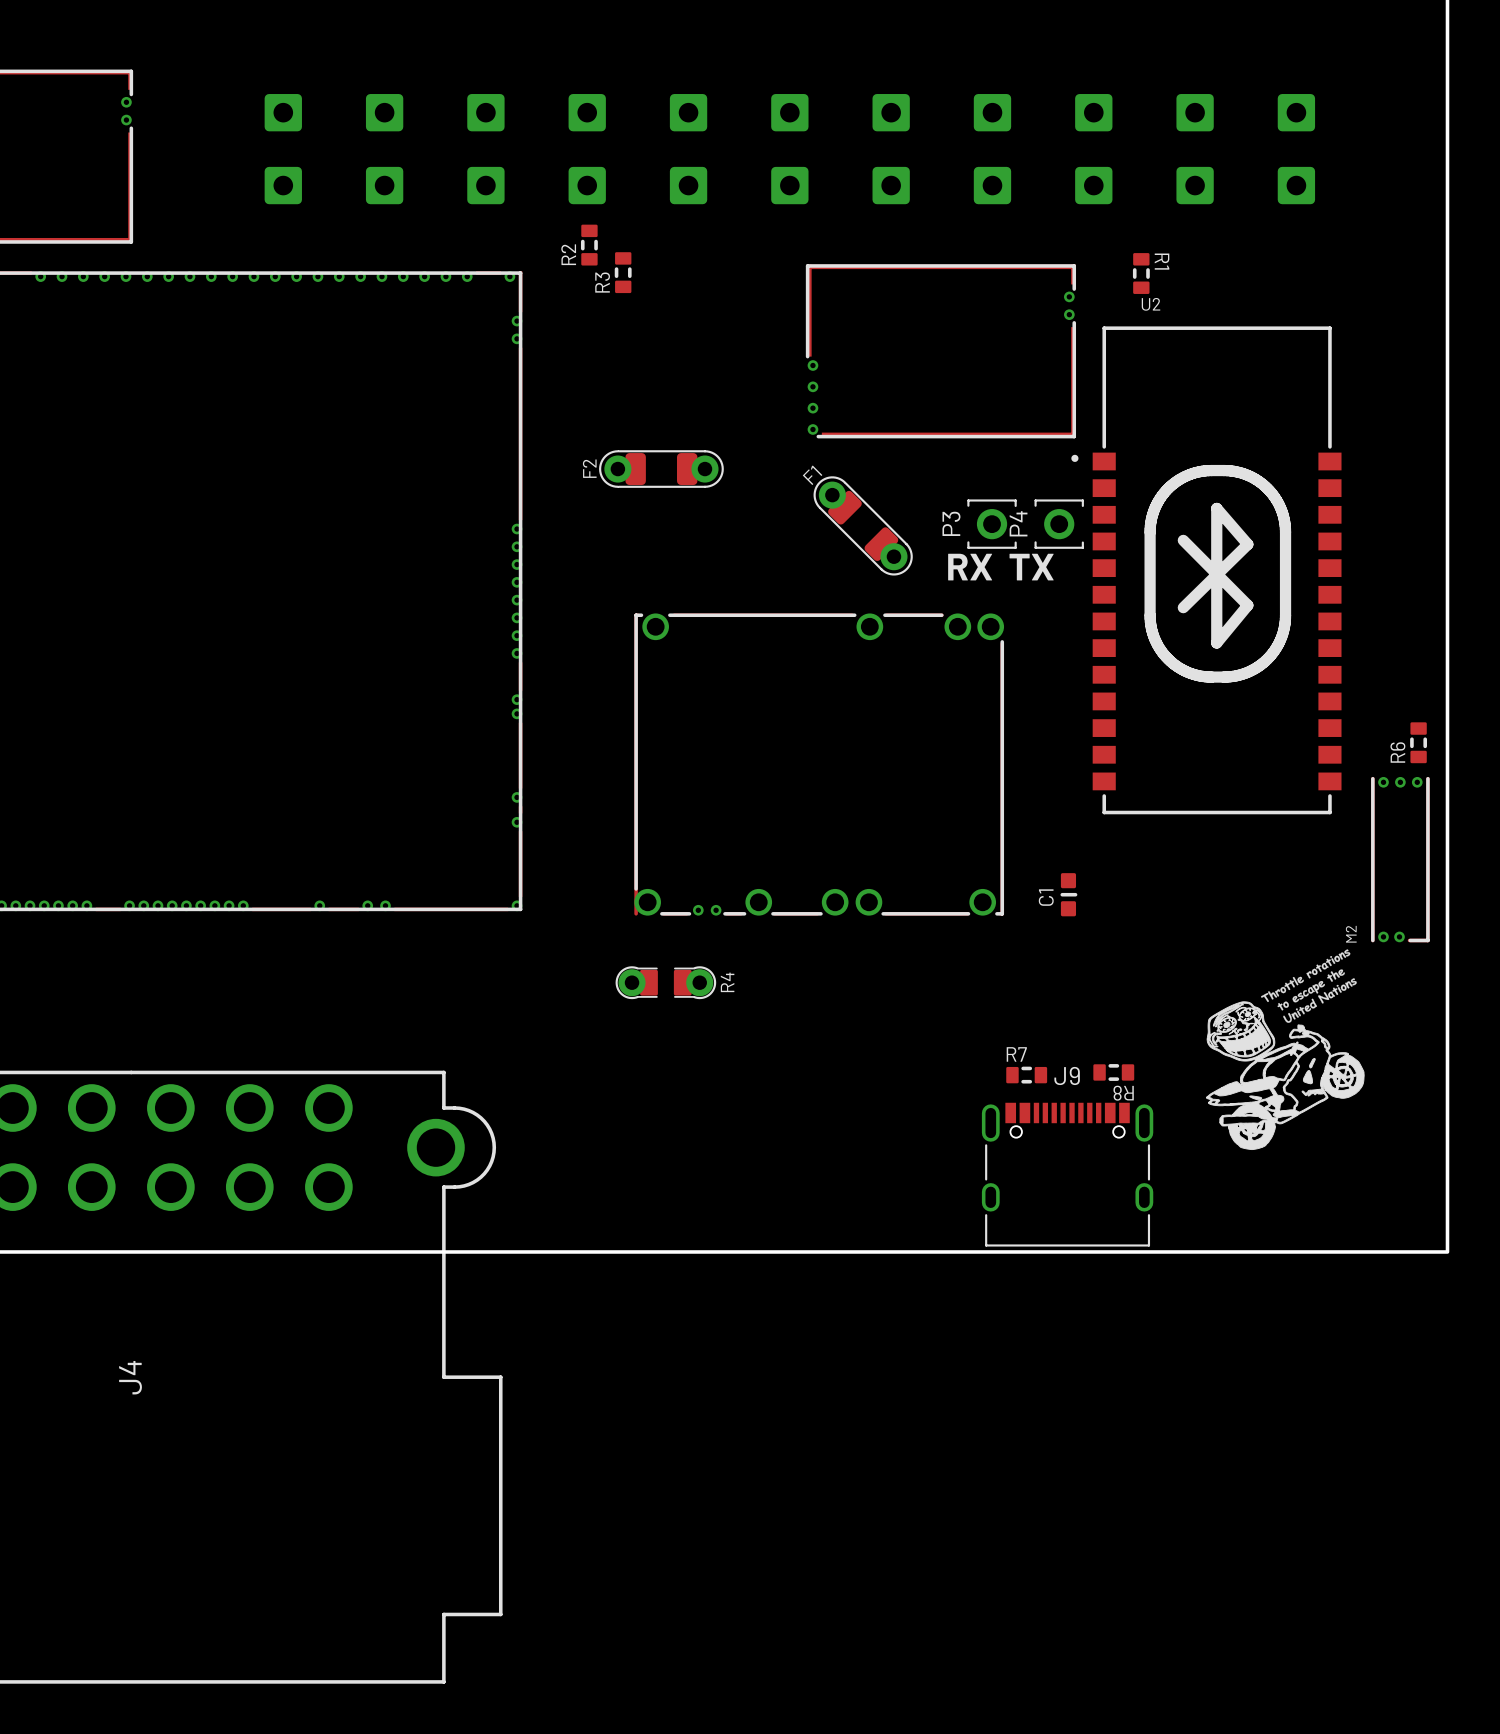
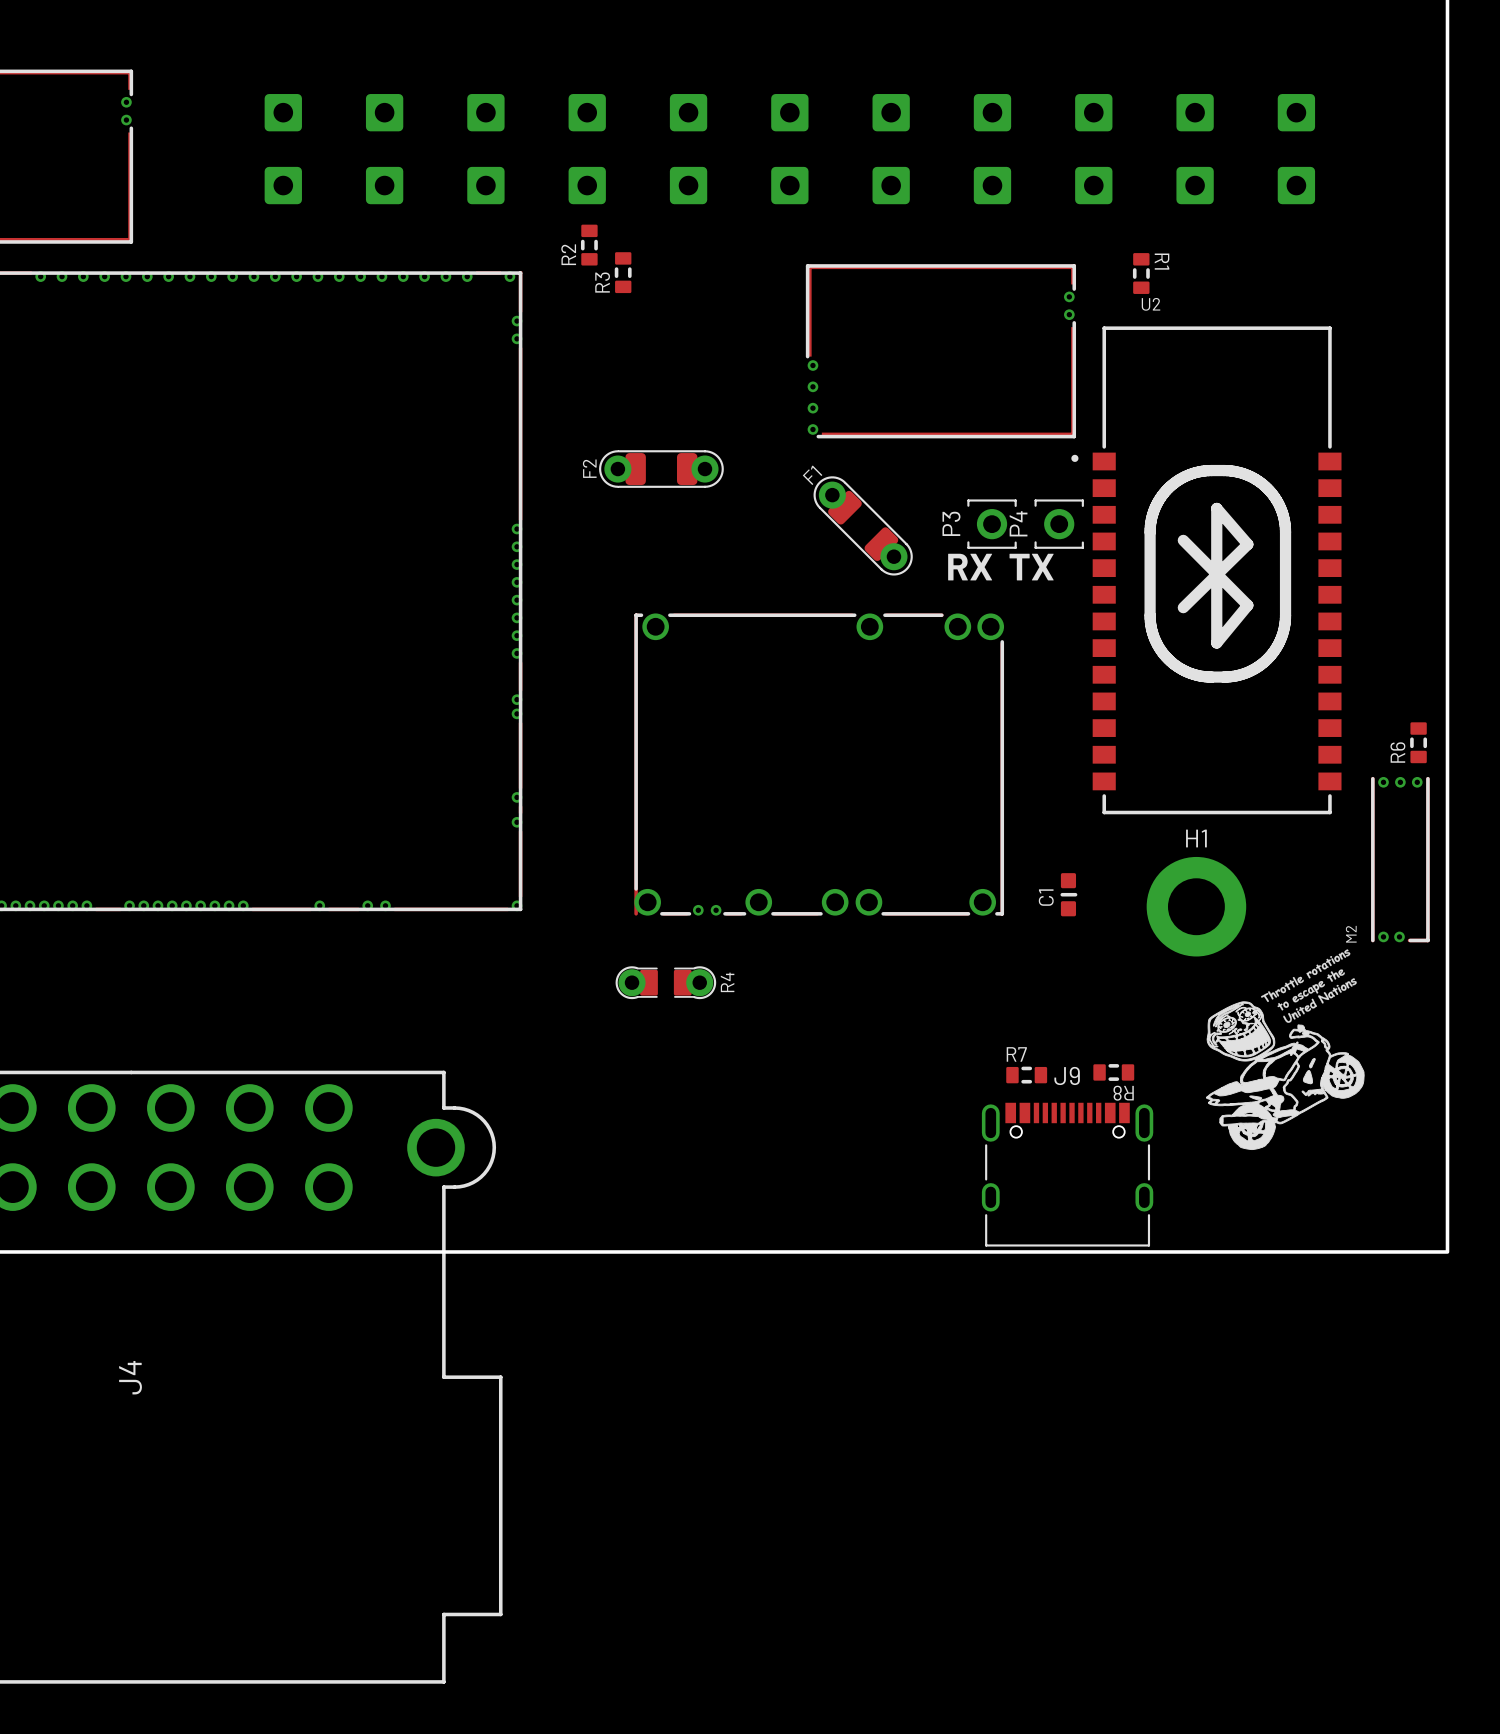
H1: none -> (1196, 906)

